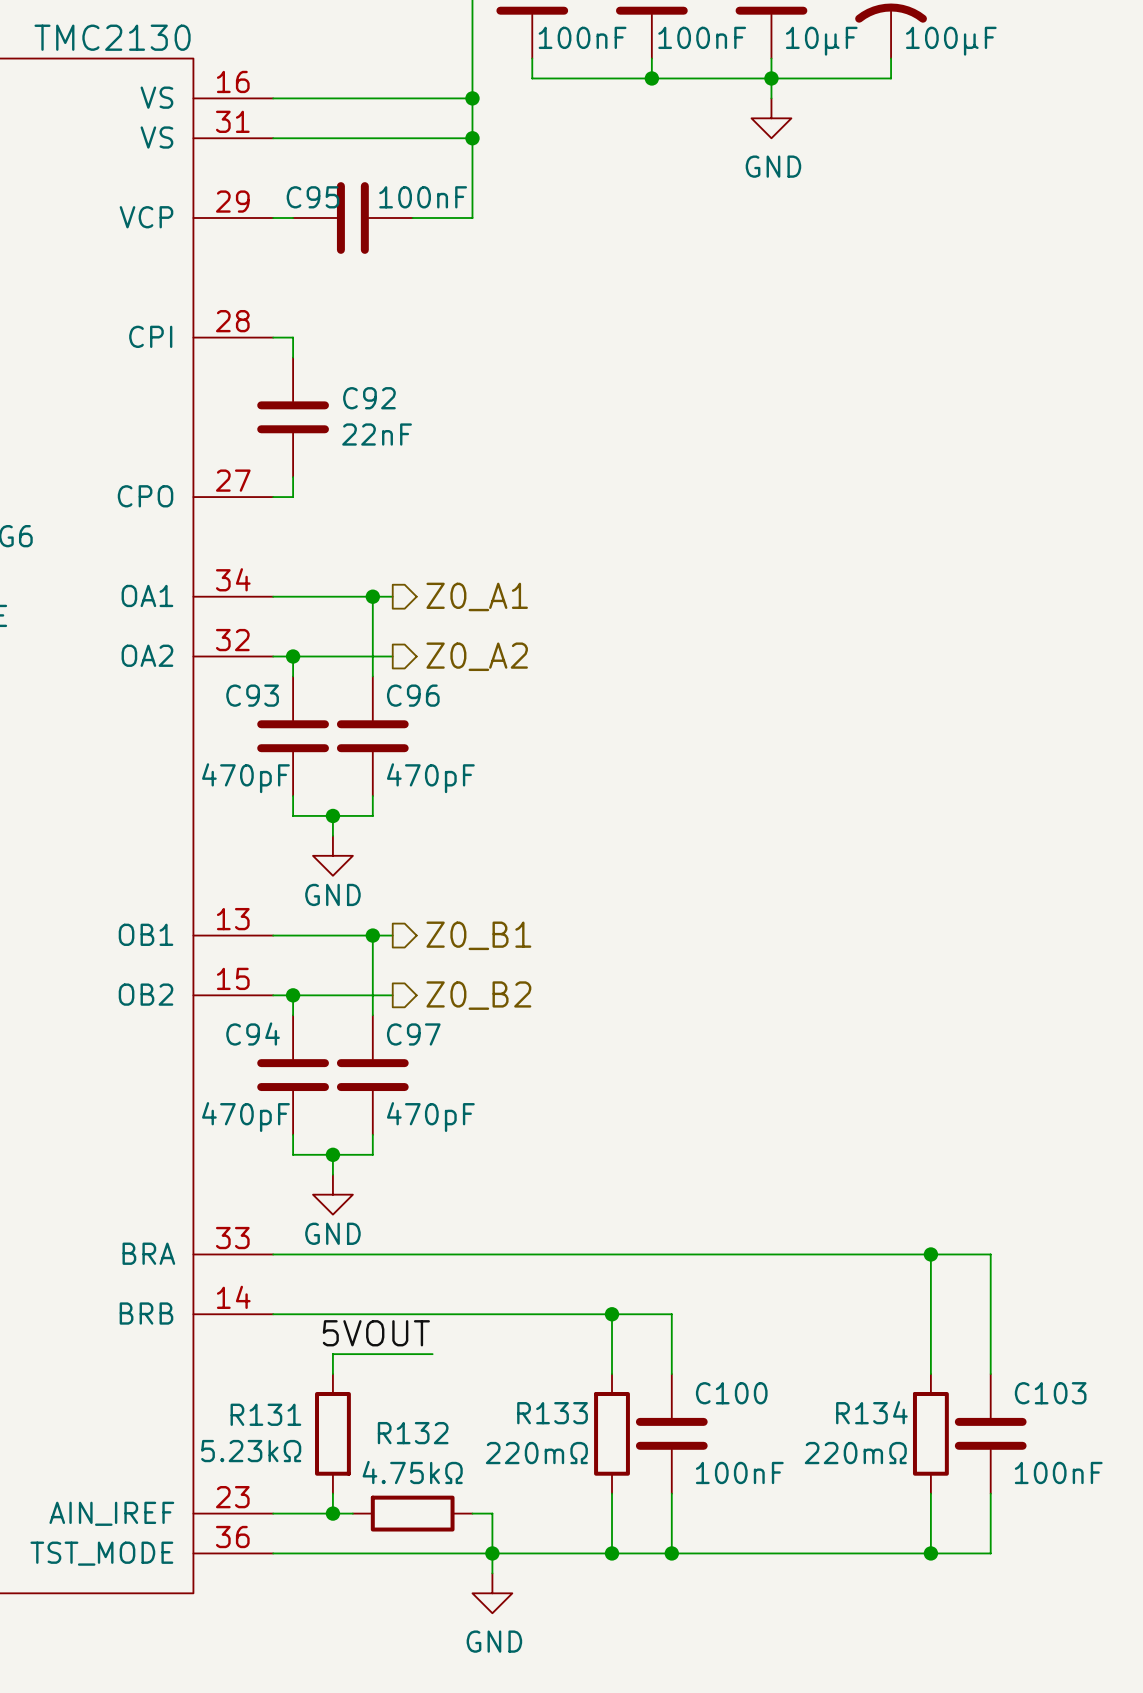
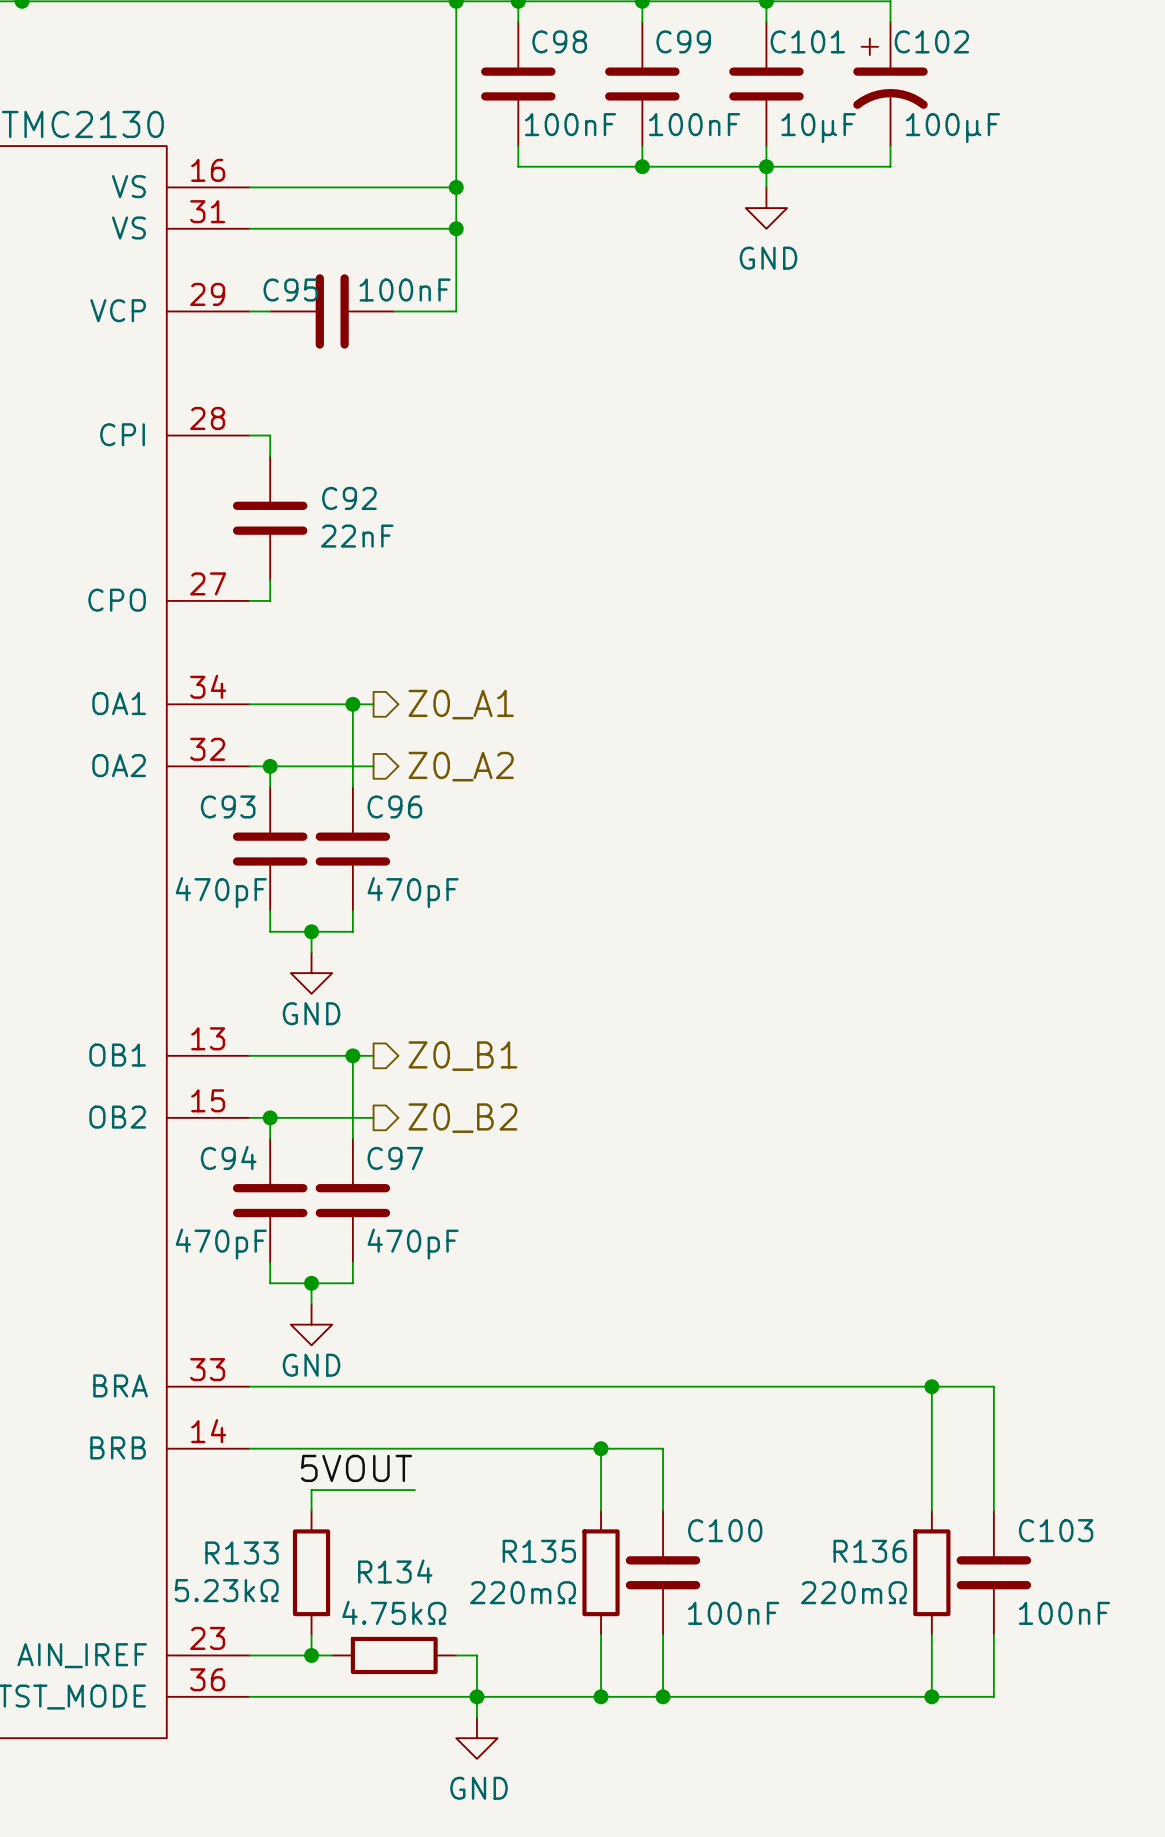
R134 name: R134 (871, 1412) -> R136 (870, 1551)
R133 name: R133 (552, 1413) -> R135 (539, 1551)
R131 name: R131 (265, 1414) -> R133 (241, 1552)
R132 name: R132 (413, 1433) -> R134 (395, 1571)

